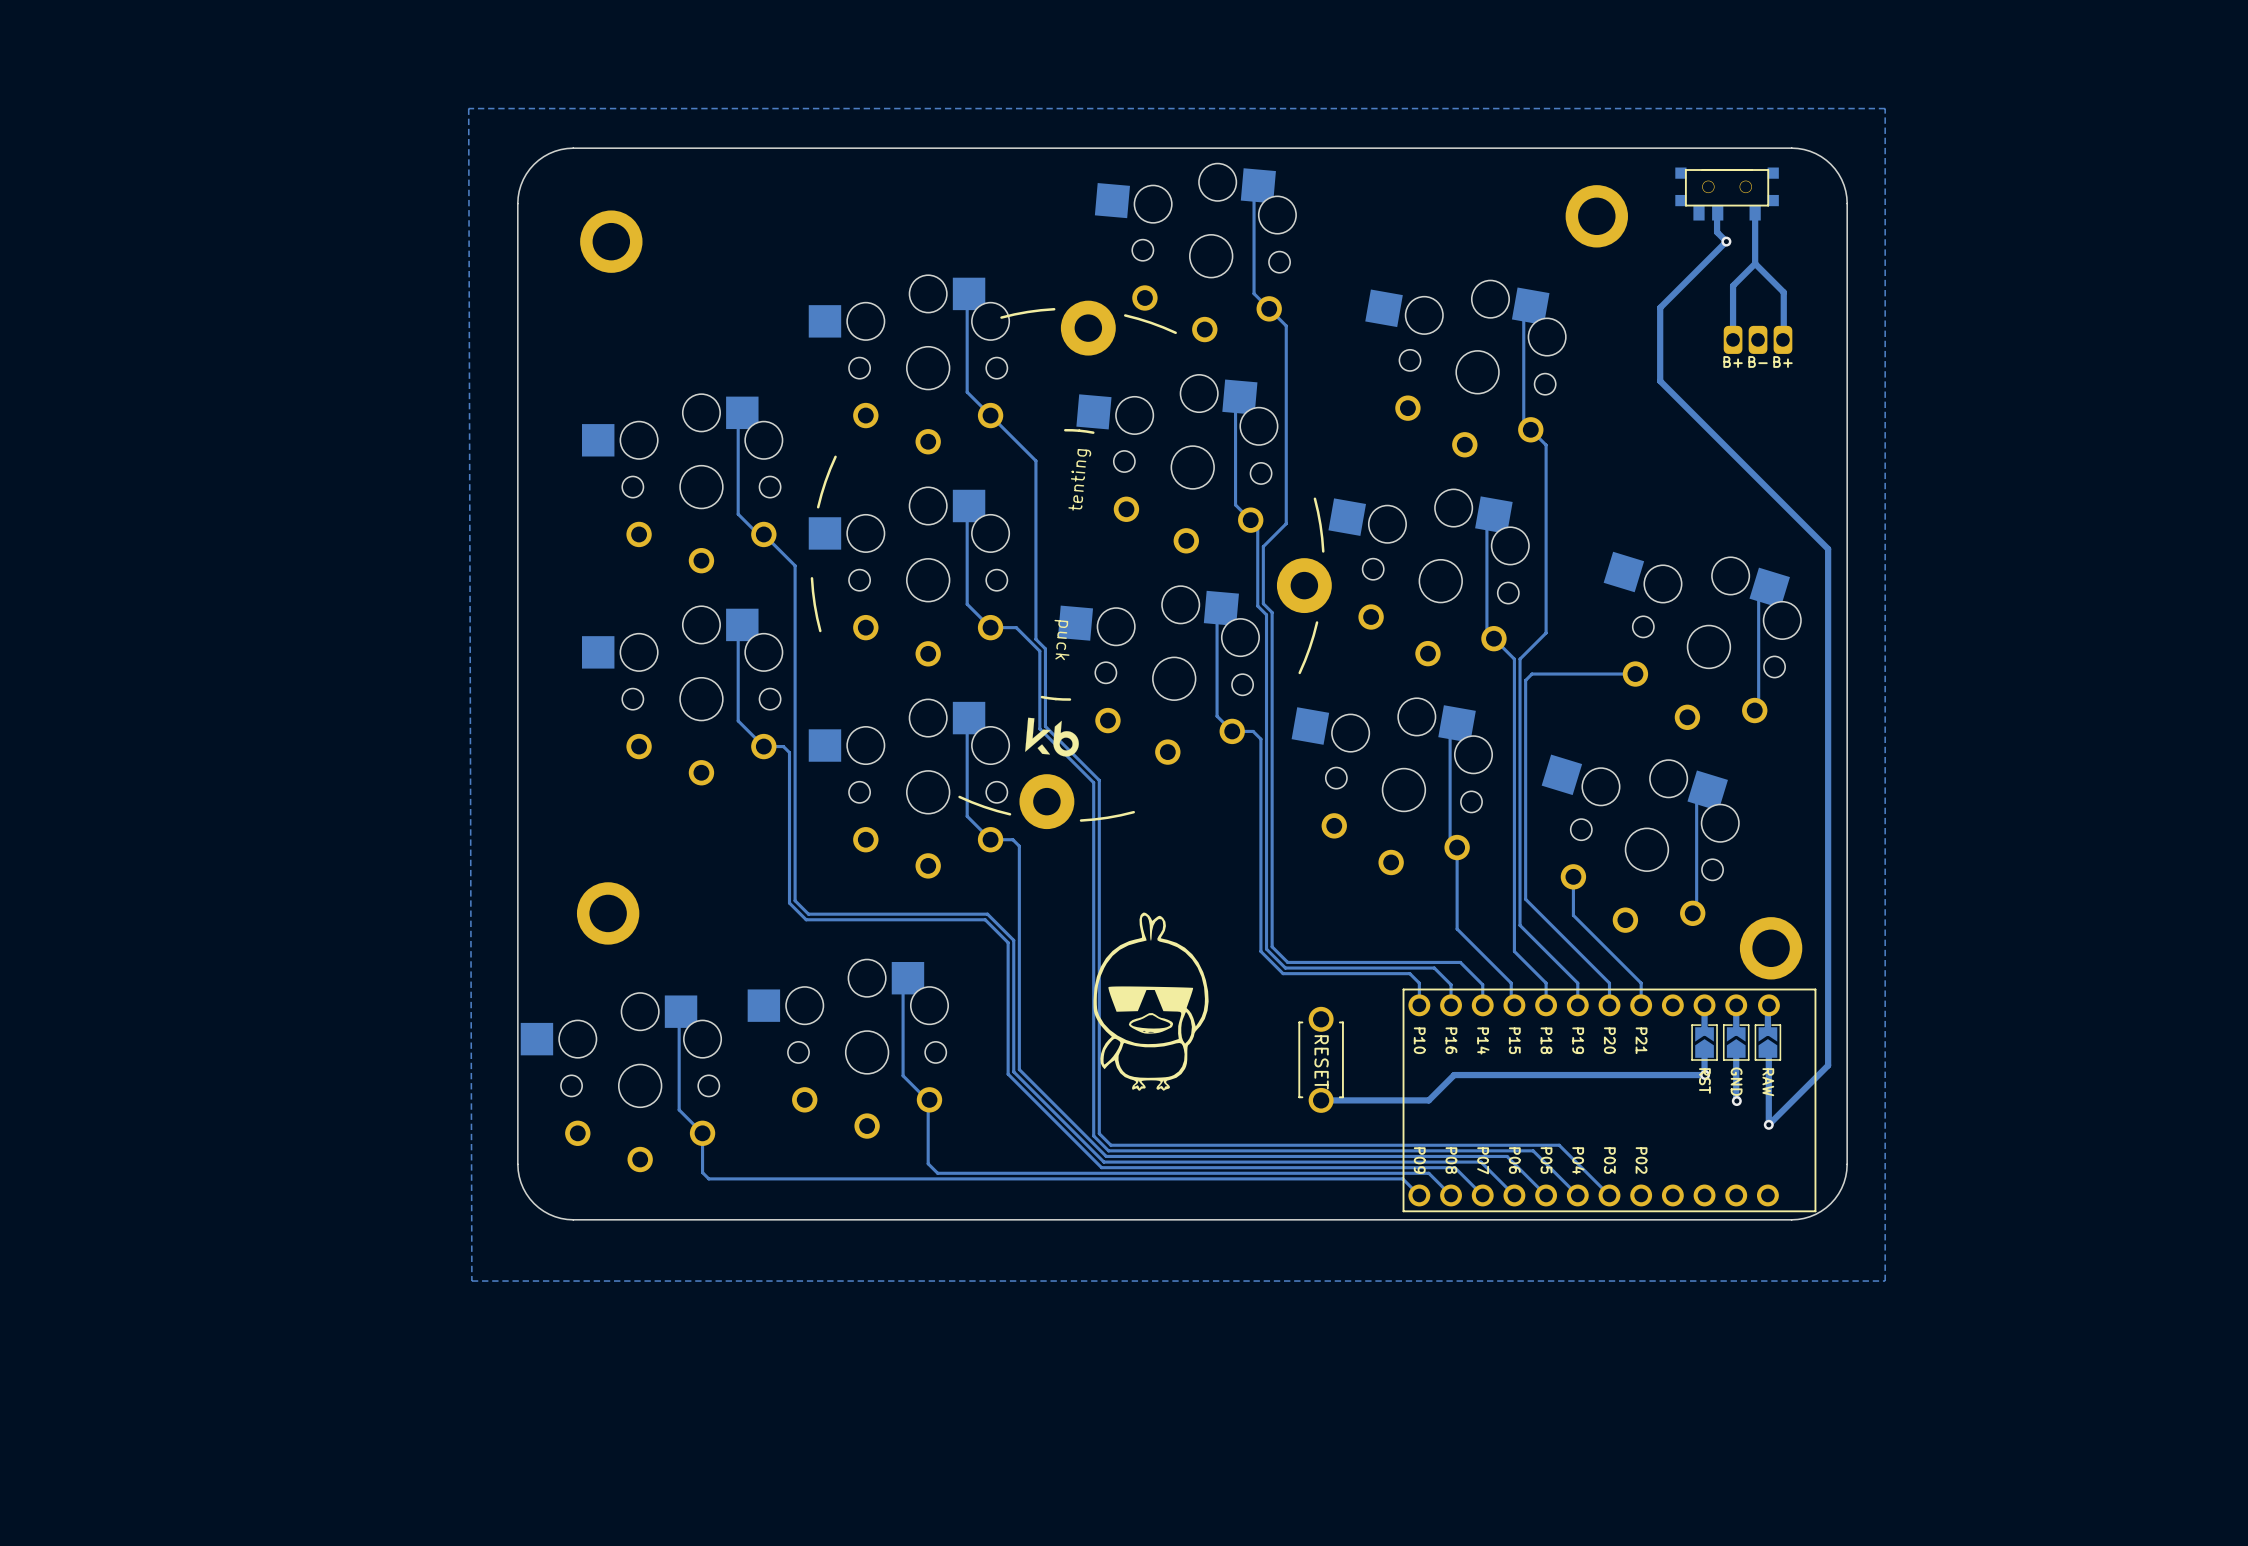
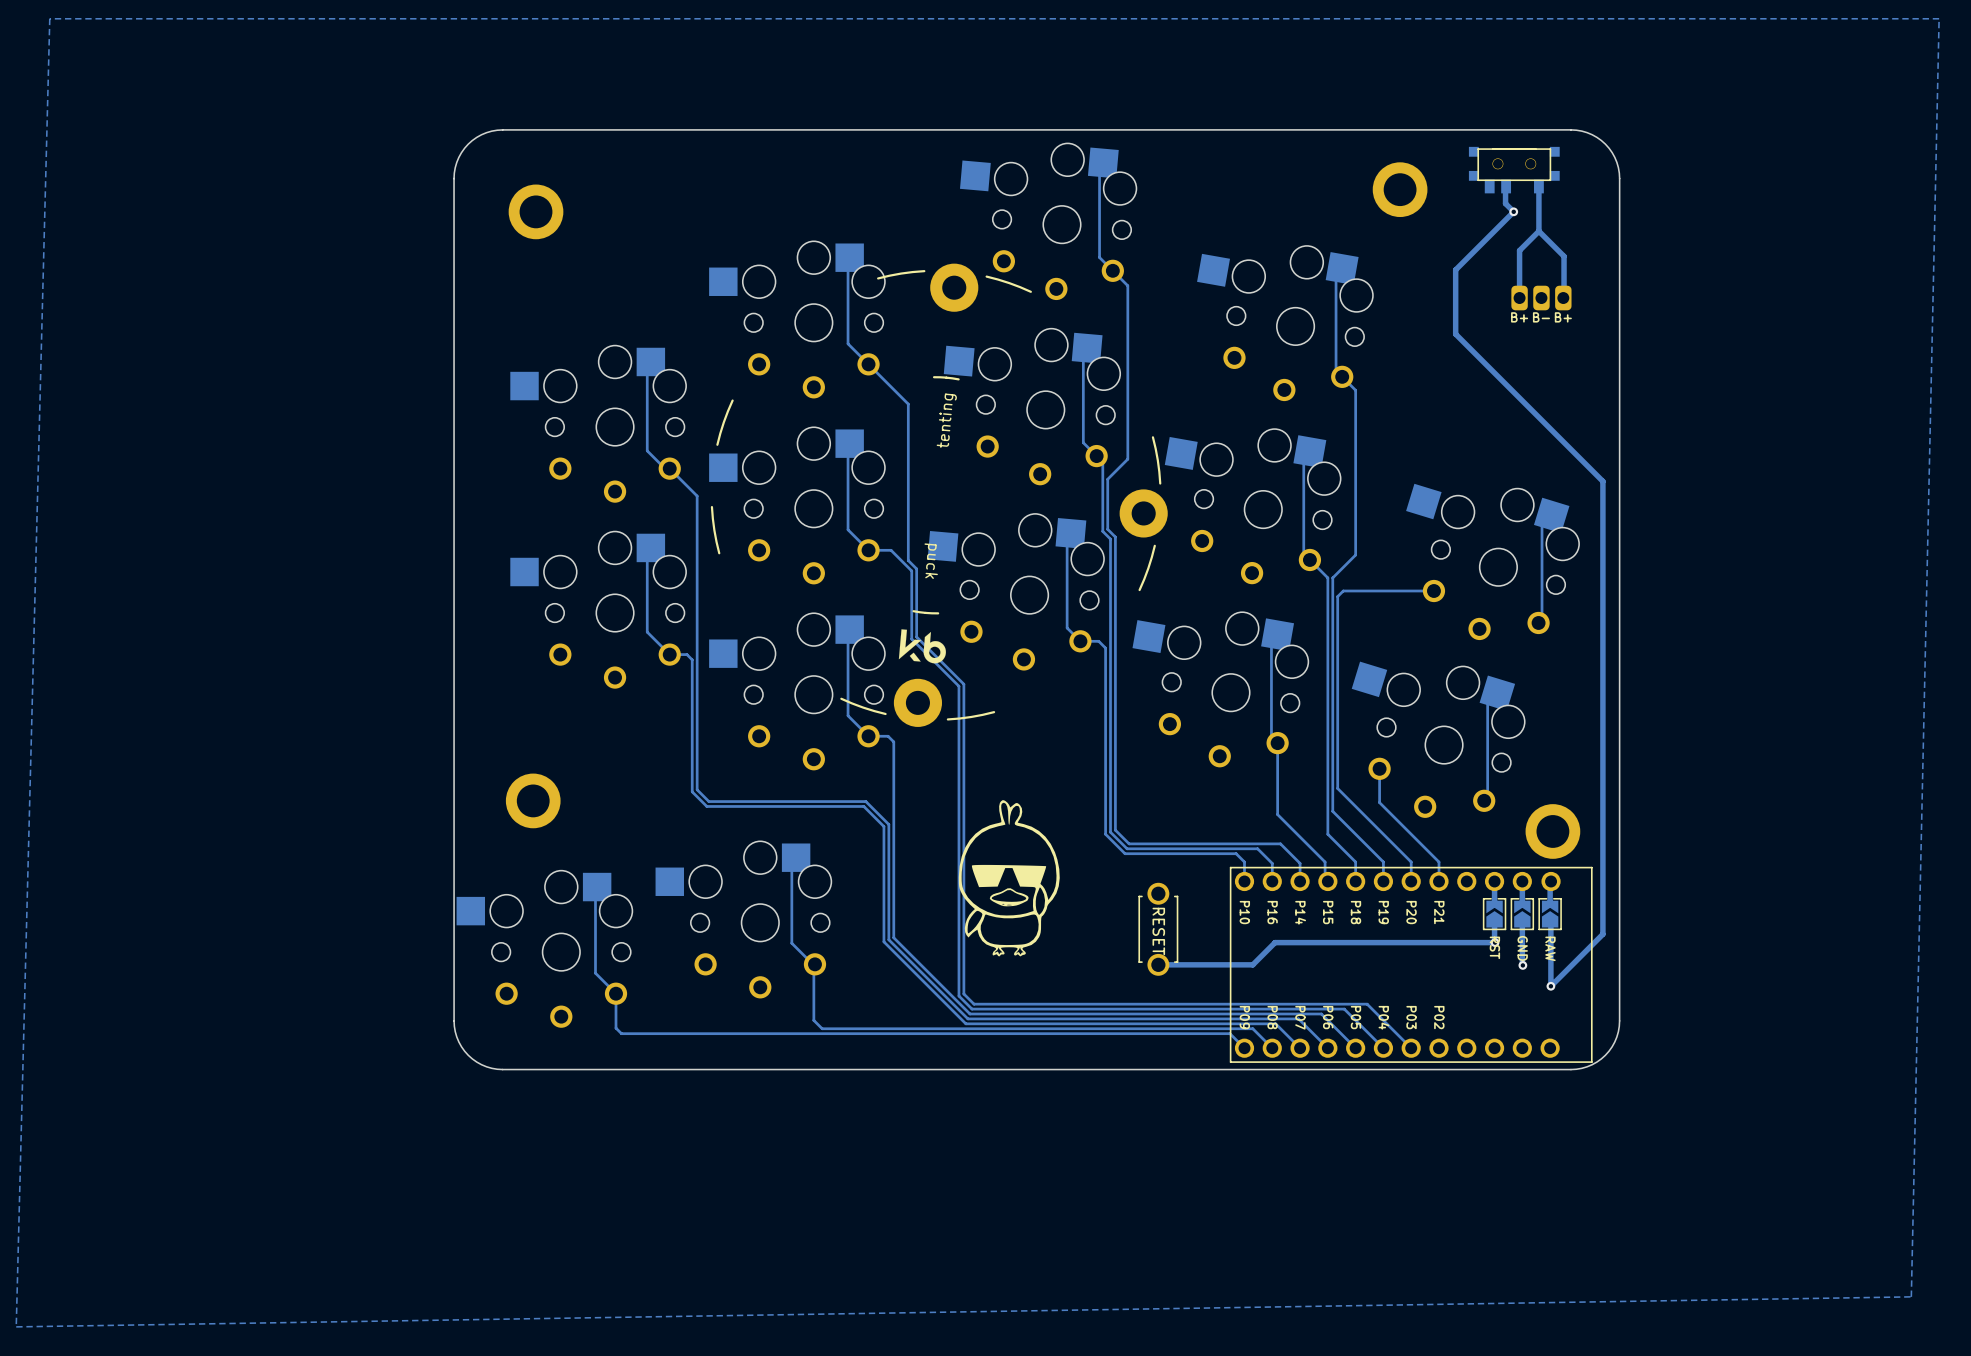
zone outline: (1885, 108) (1885, 1281) (471, 1281) (468, 108) (1885, 108) -> (1939, 18) (1911, 1296) (16, 1326) (49, 18) (1939, 18)

